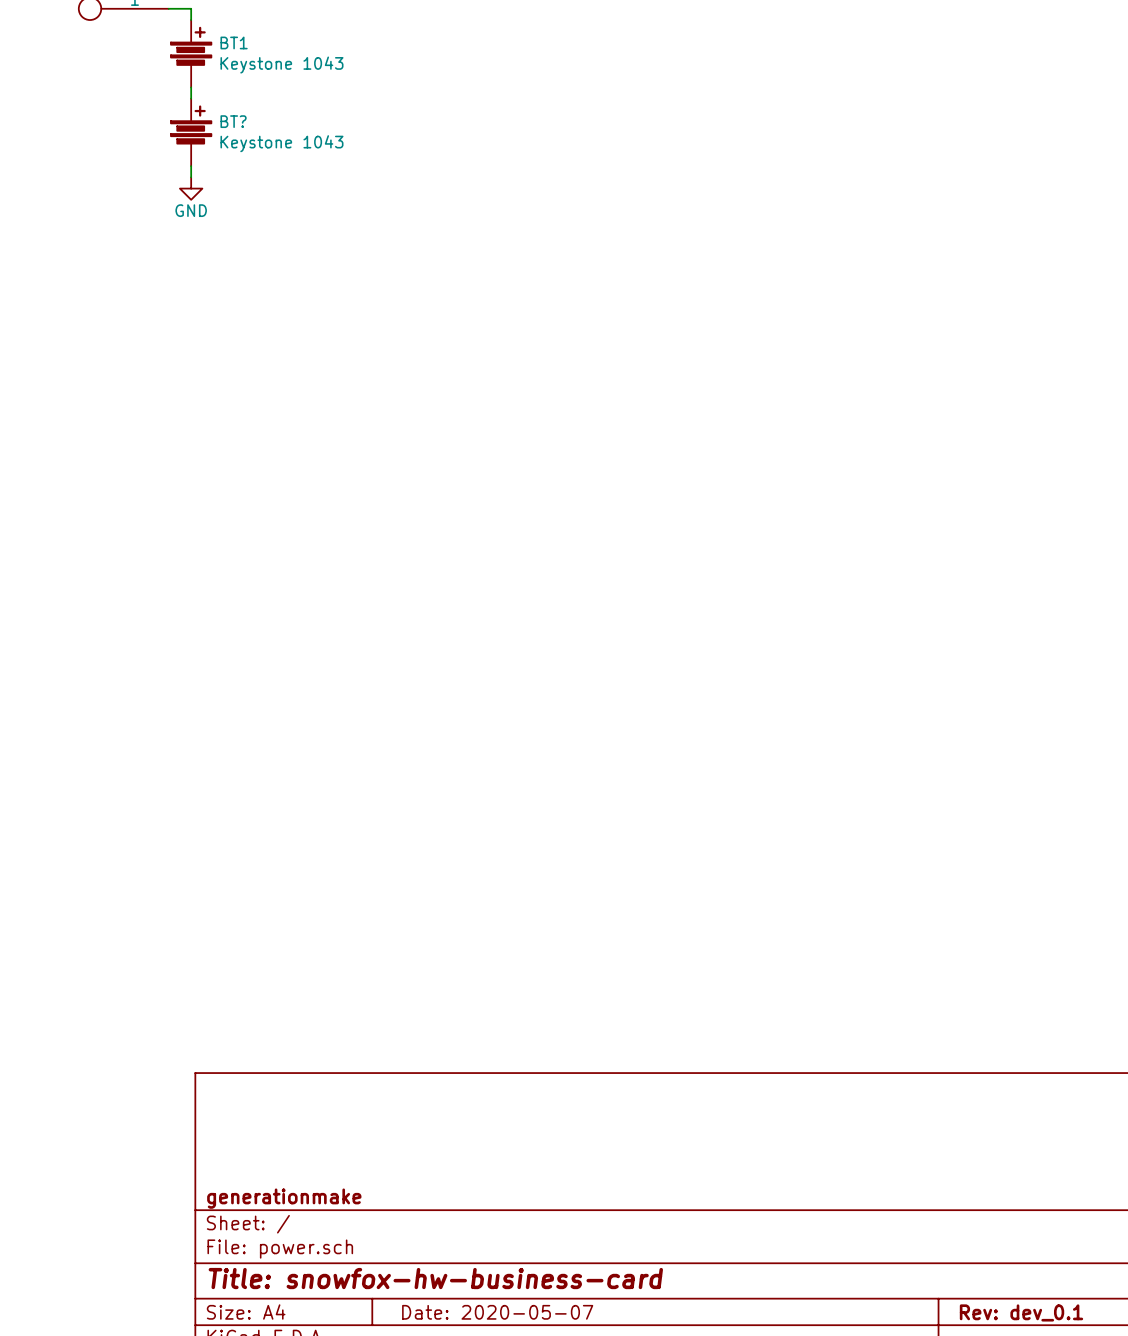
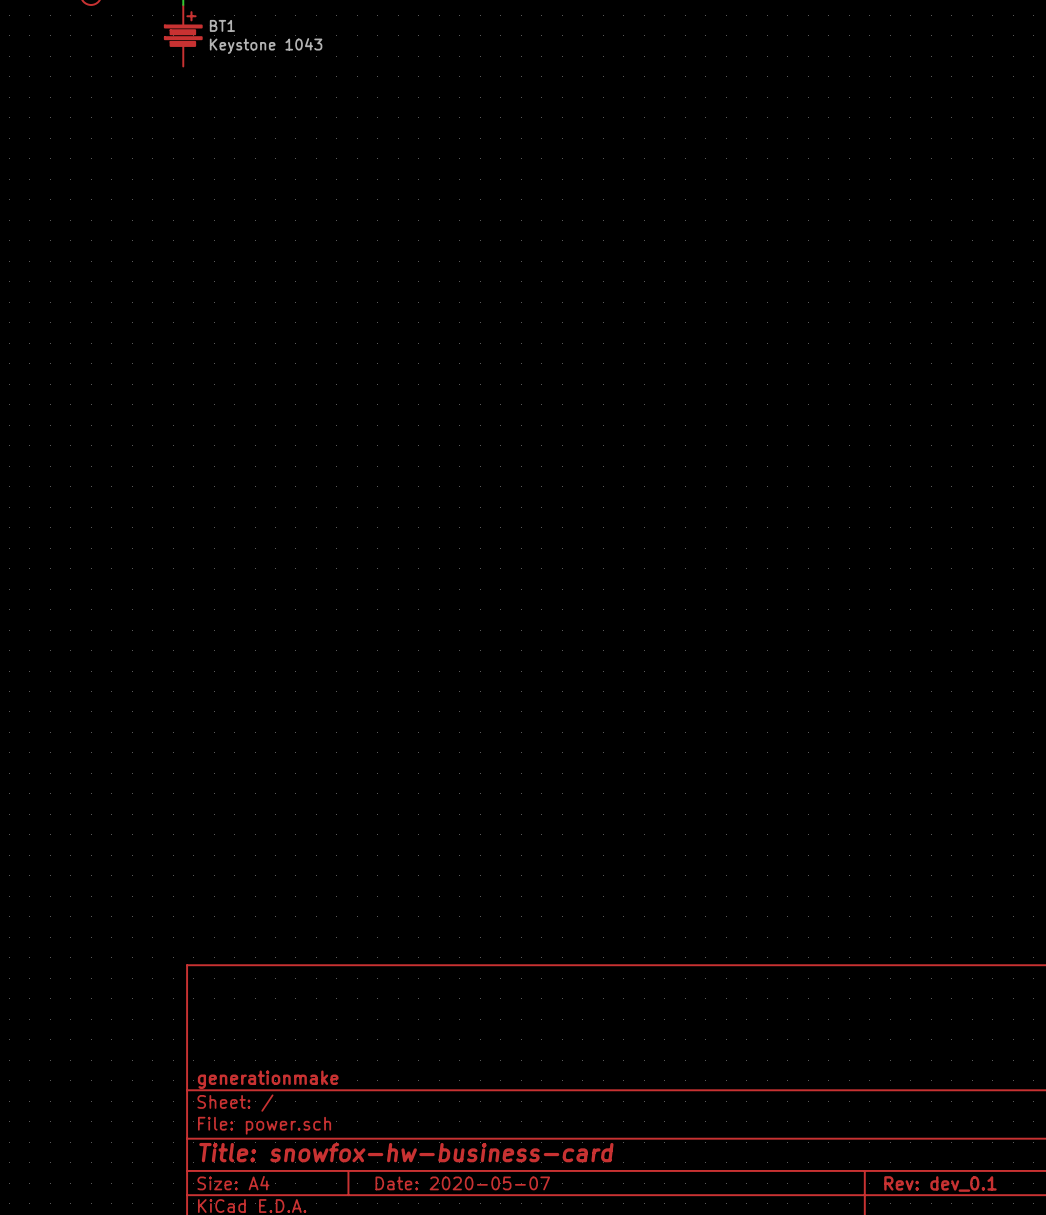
wire: (191, 87) (191, 98) -> none
BT?: Keystone 1043 (191, 132) -> none
wire: (191, 166) (191, 177) -> none
power symbol: GND (191, 188) -> none

